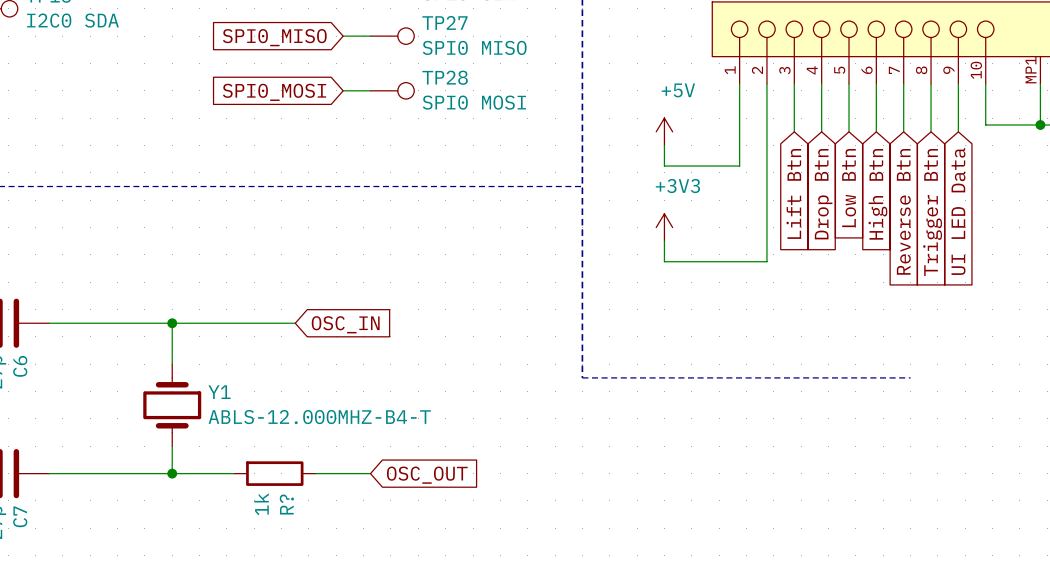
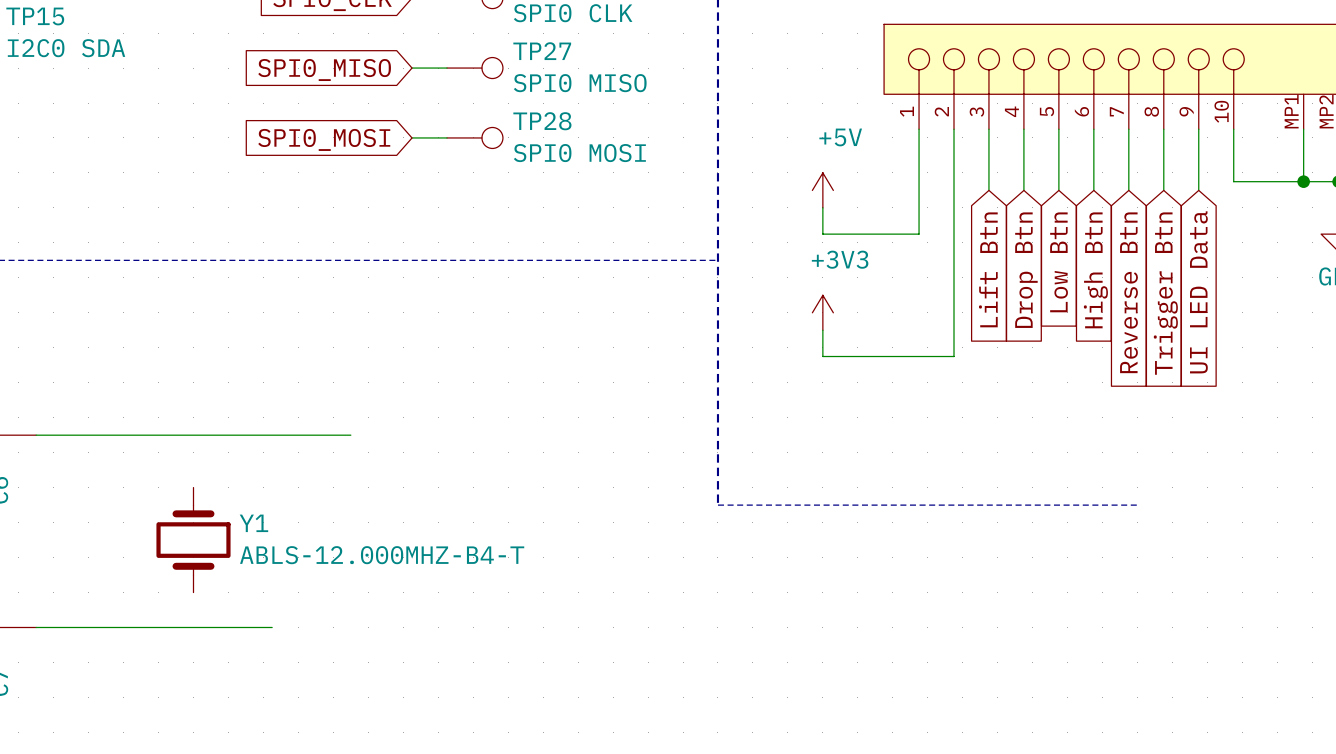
wire: (172, 323) (172, 364) -> none
junction: (172, 323) -> none
global label: OSC_IN (345, 324) -> none
wire: (172, 446) (172, 473) -> none
junction: (172, 473) -> none
R?: 1k (274, 473) -> none
wire: (315, 473) (370, 473) -> none
global label: OSC_OUT (427, 475) -> none

